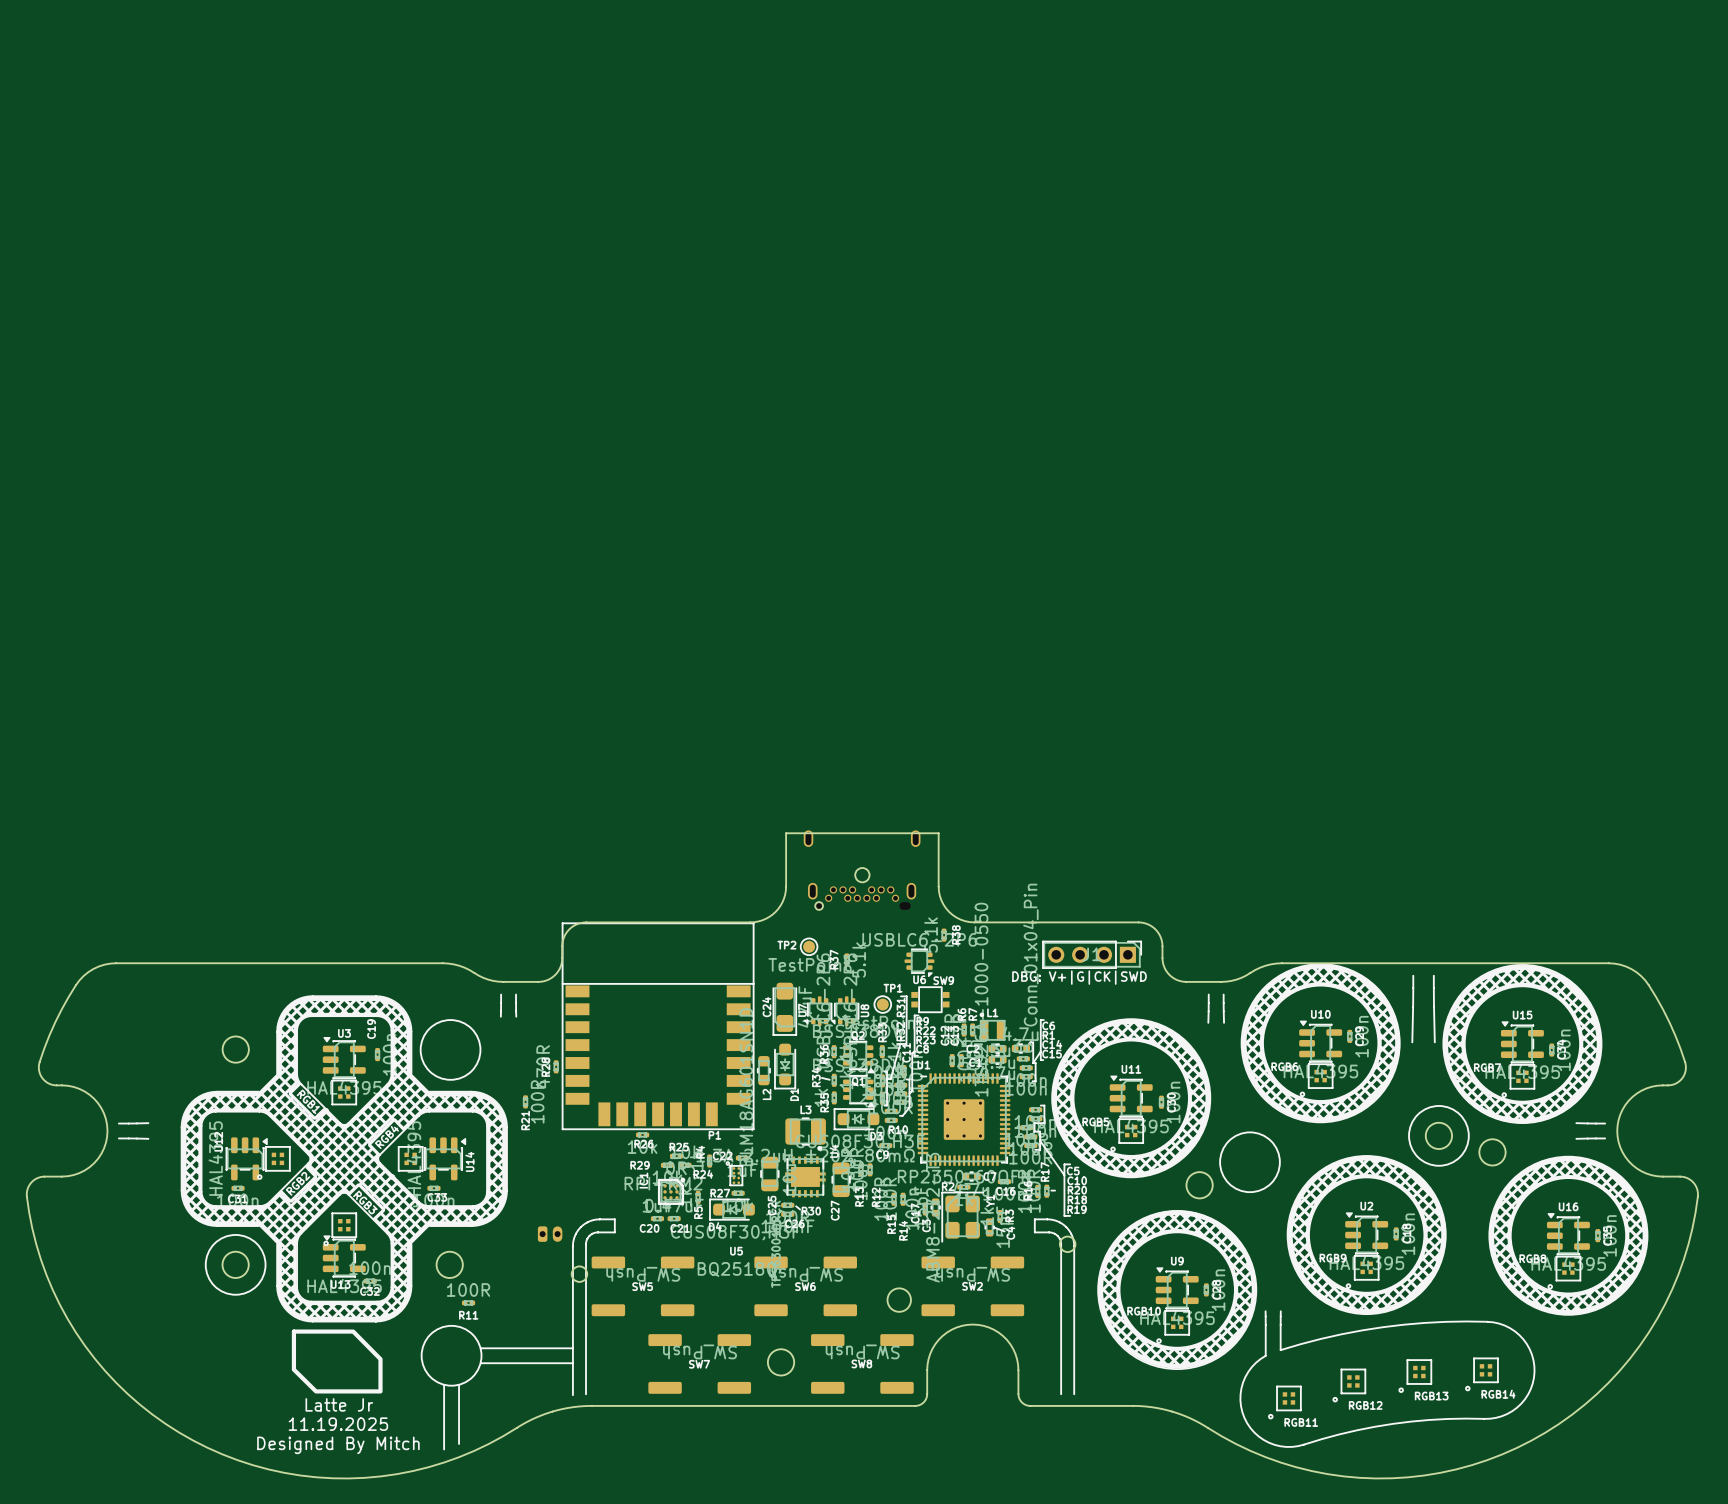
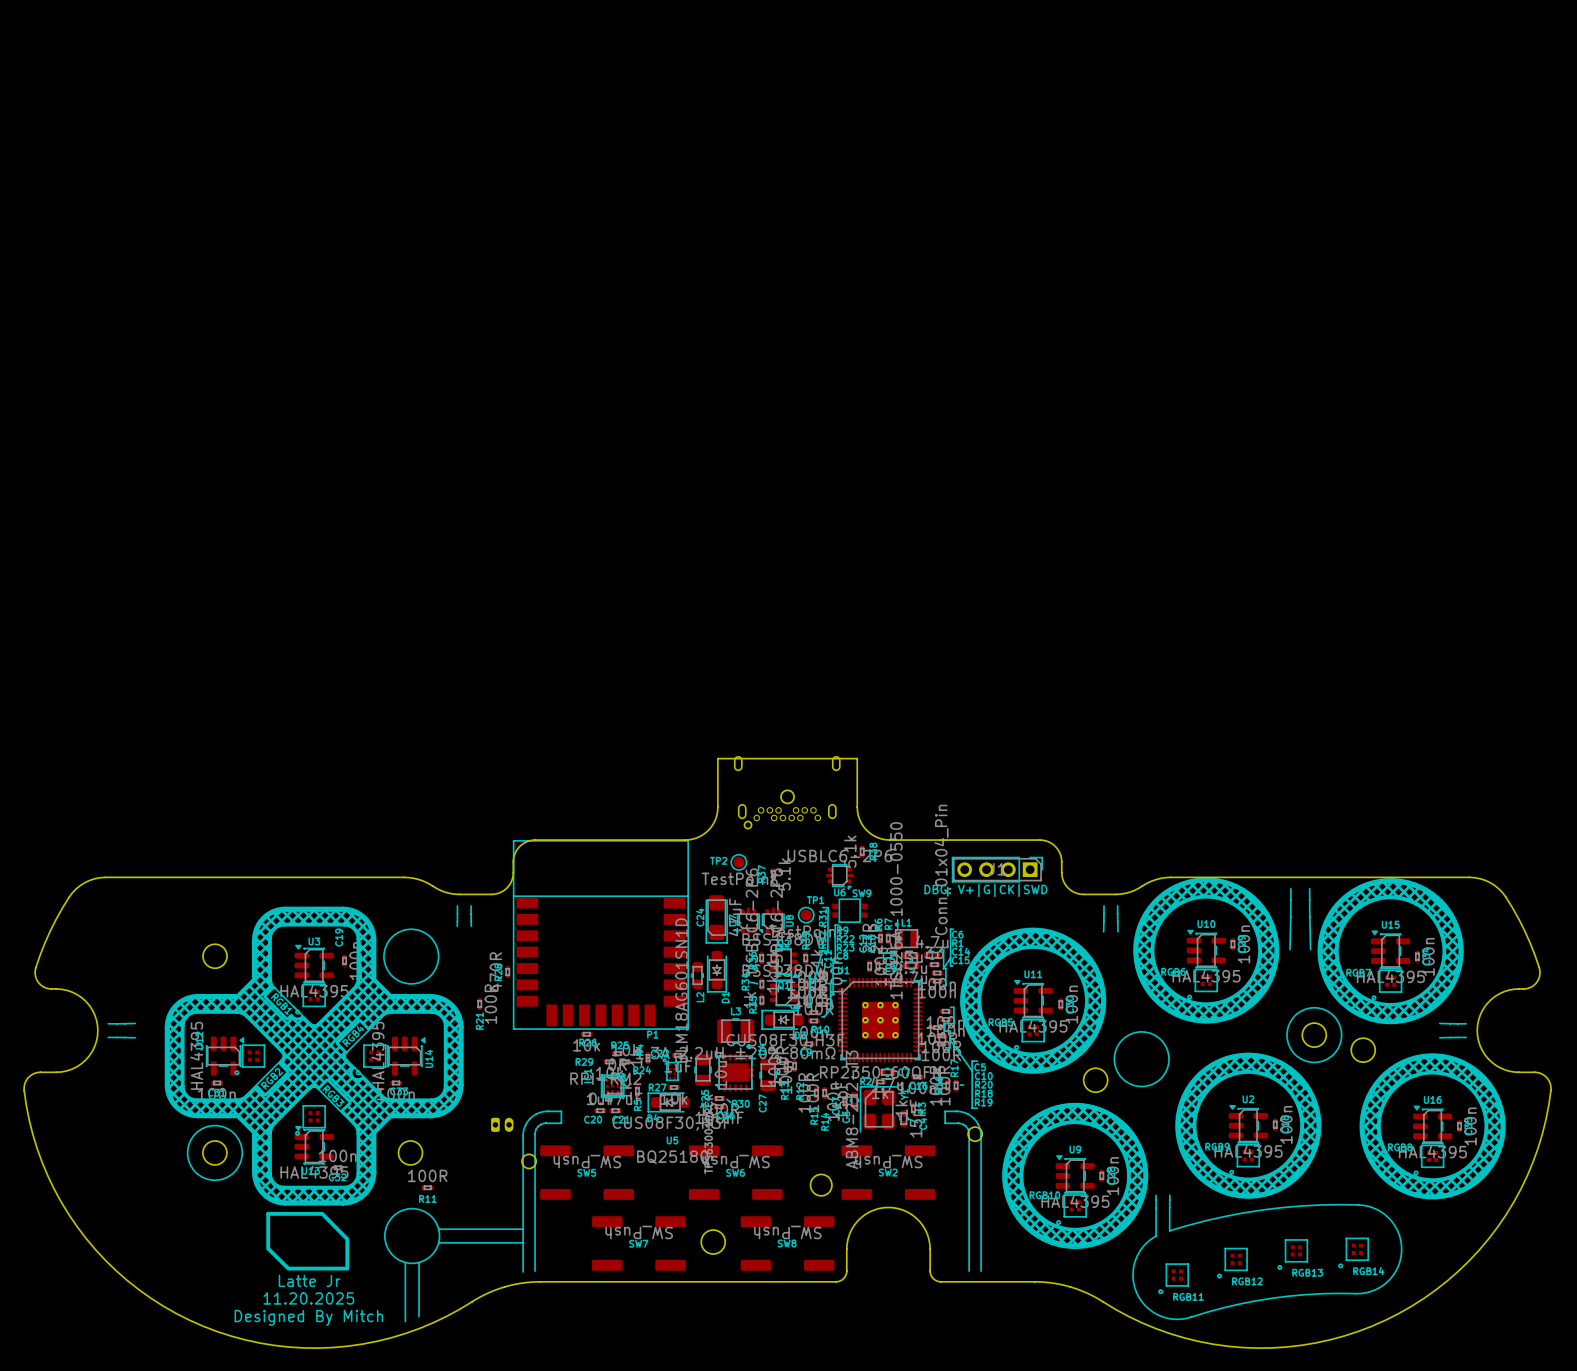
drawing shape: [181, 996, 508, 1322] -> [165, 907, 463, 1205]
text: 11.19.2025 (338, 1424) -> 11.20.2025 (308, 1298)

